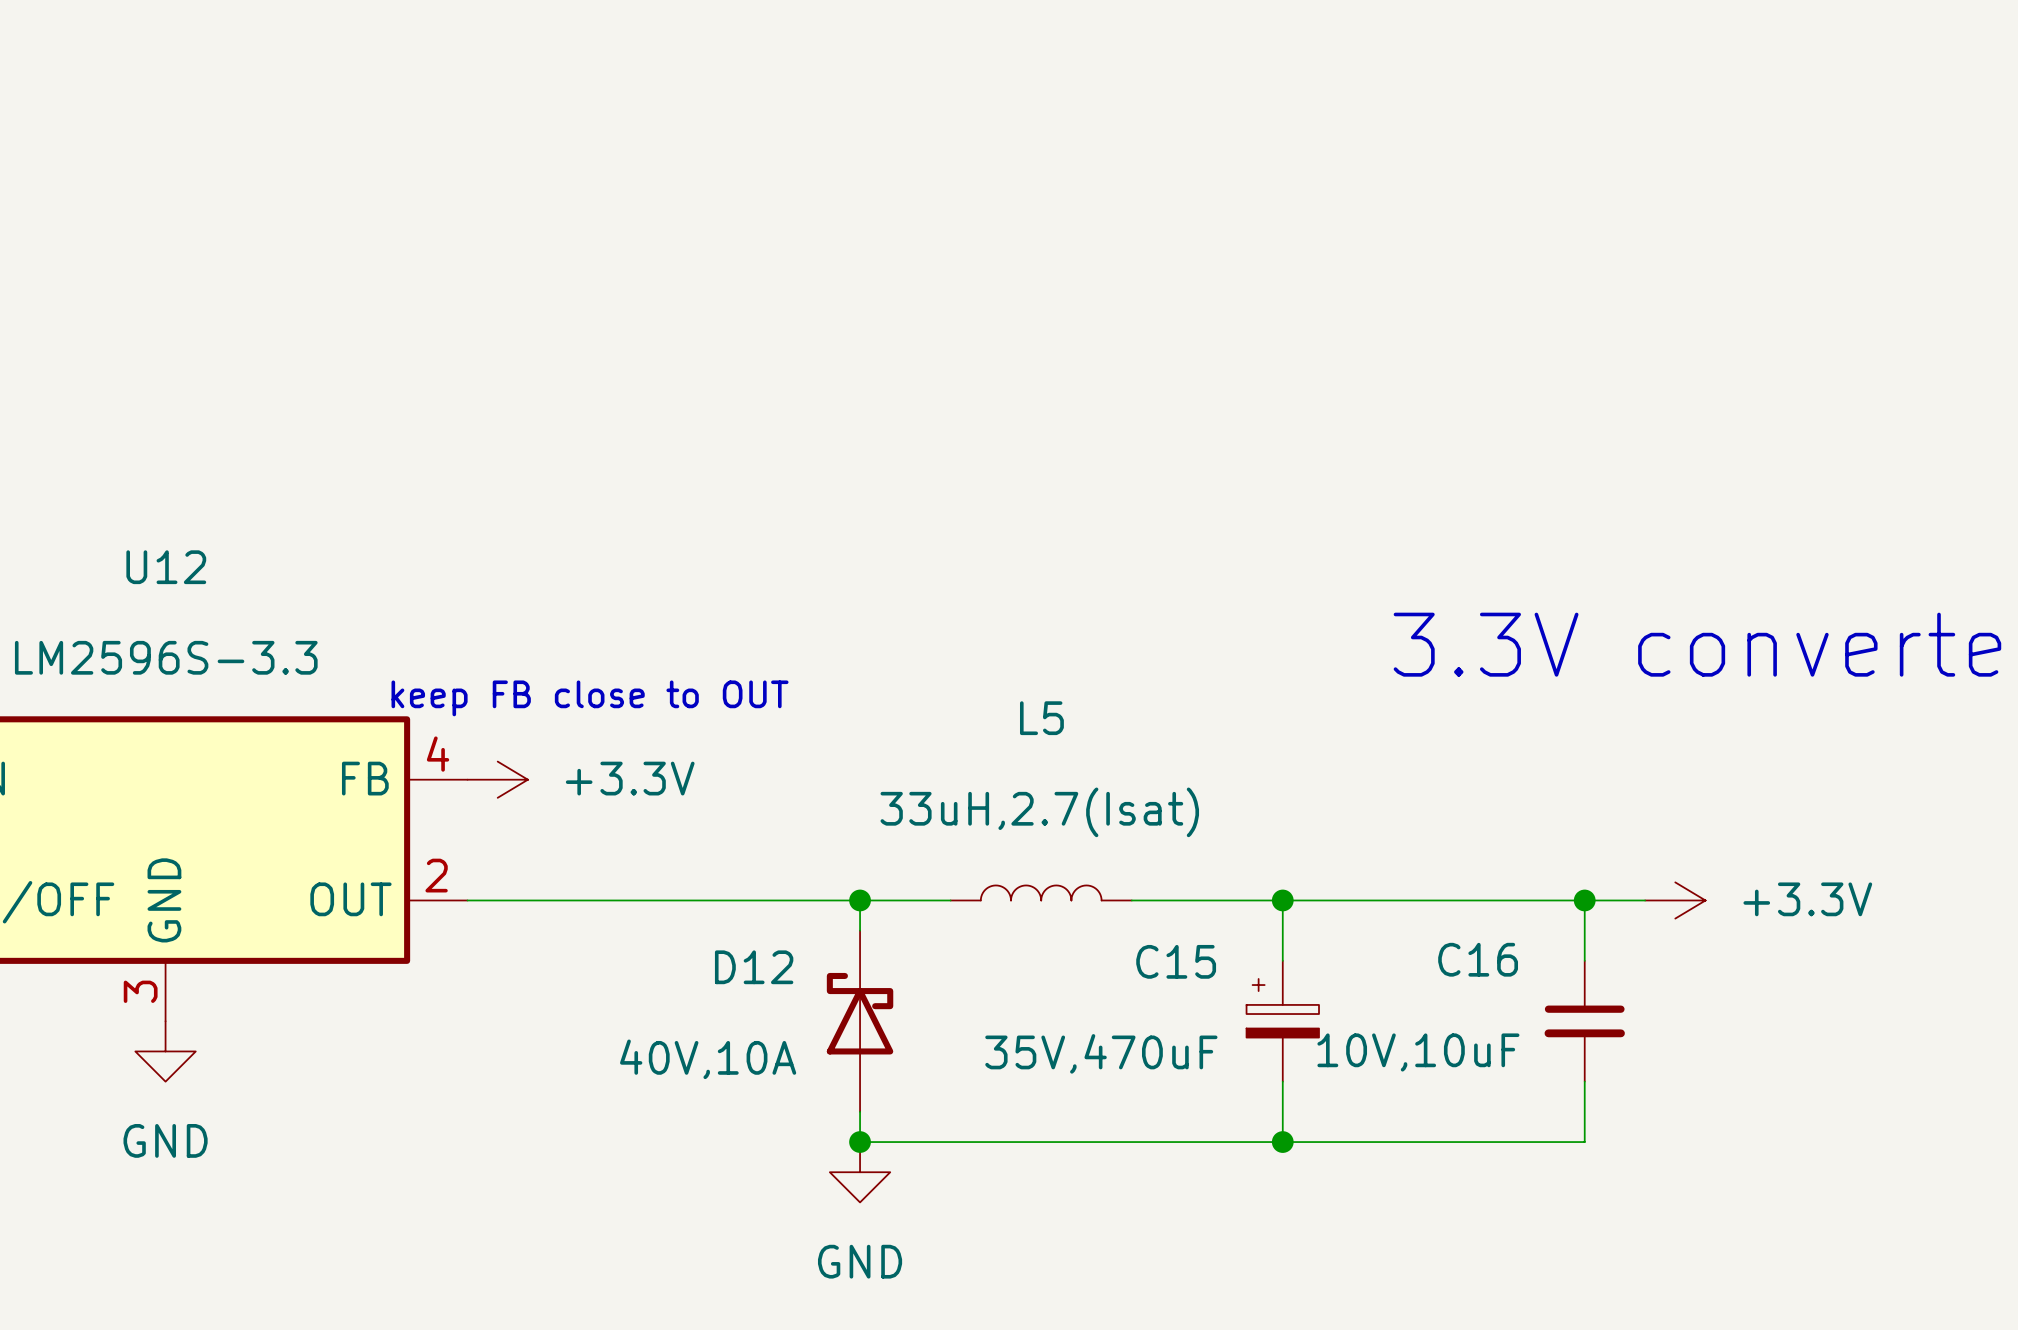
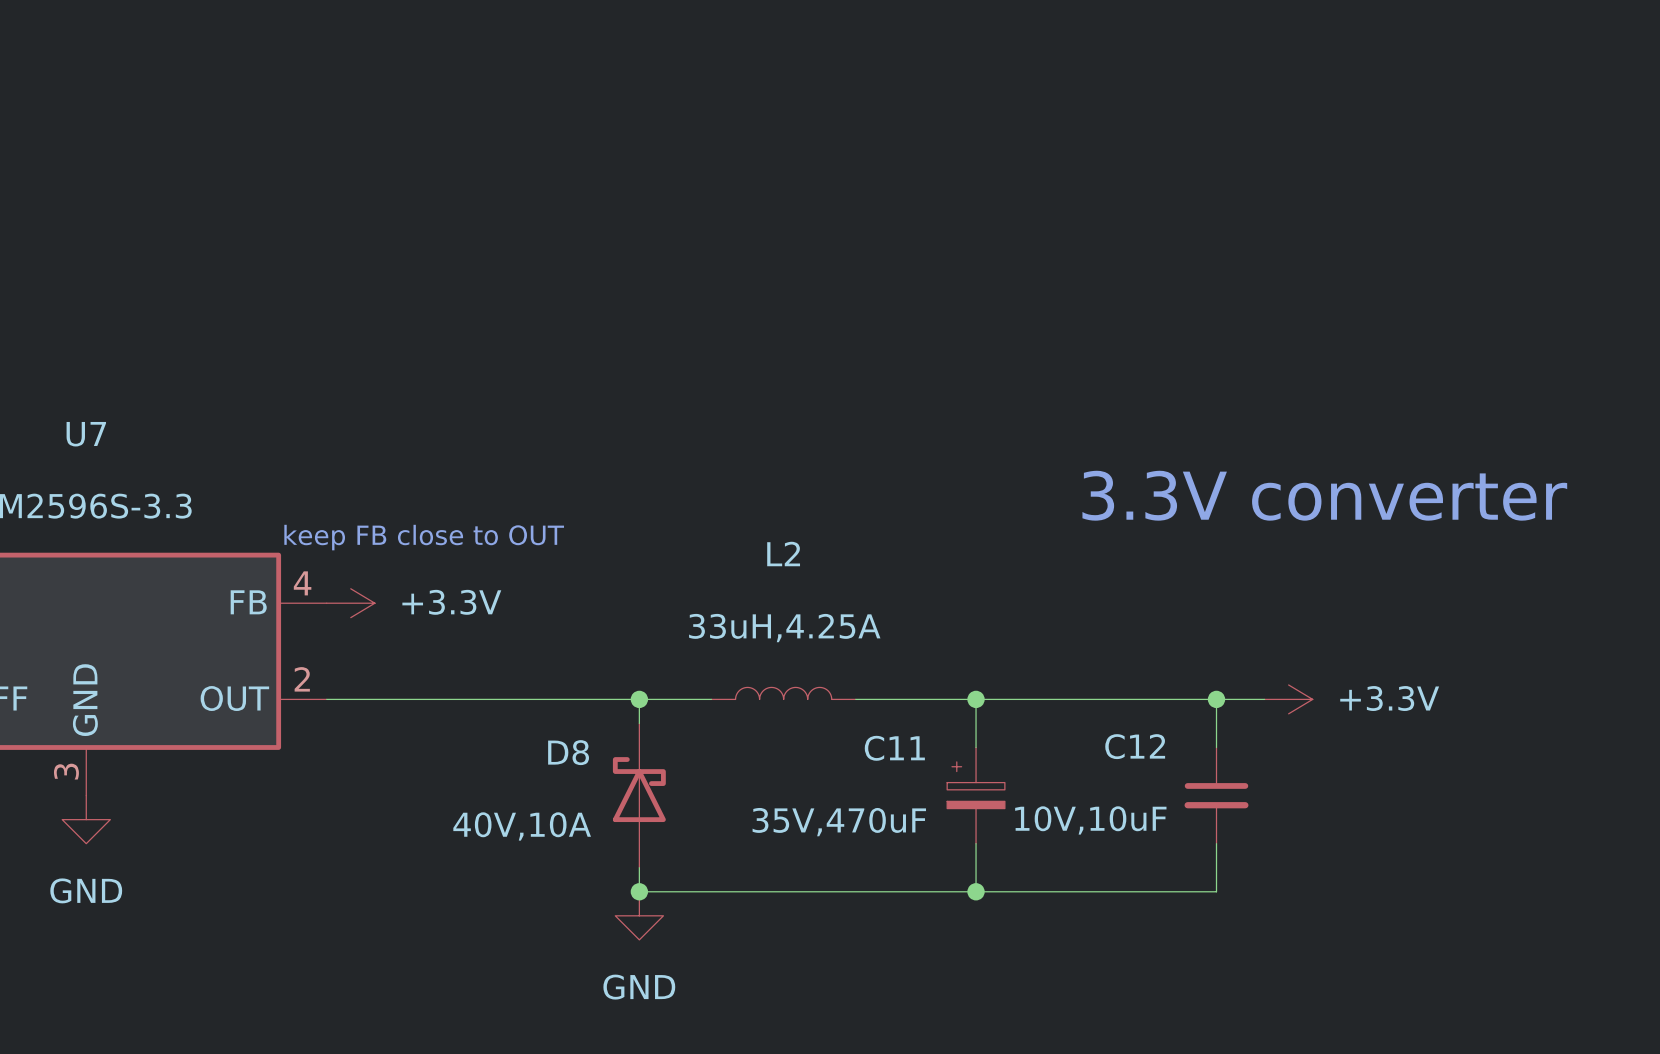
U12 name: U12 (166, 567) -> U7 (86, 434)
L5 name: L5 (1041, 718) -> L2 (783, 554)
L5 value: 33uH,2.7(Isat) (1039, 812) -> 33uH,4.25A (784, 628)
C16 name: C16 (1478, 959) -> C12 (1135, 746)
C15 name: C15 (1176, 961) -> C11 (894, 748)
D12 name: D12 (754, 967) -> D8 (568, 752)

